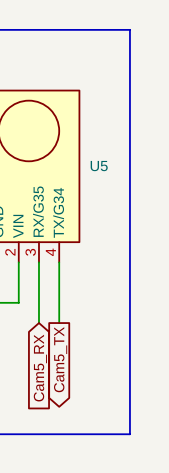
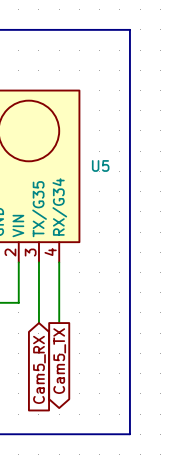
U5 pin name: RX/G35 (38, 211) -> TX/G35 (39, 209)
U5 pin name: TX/G34 (58, 212) -> RX/G34 (59, 207)

